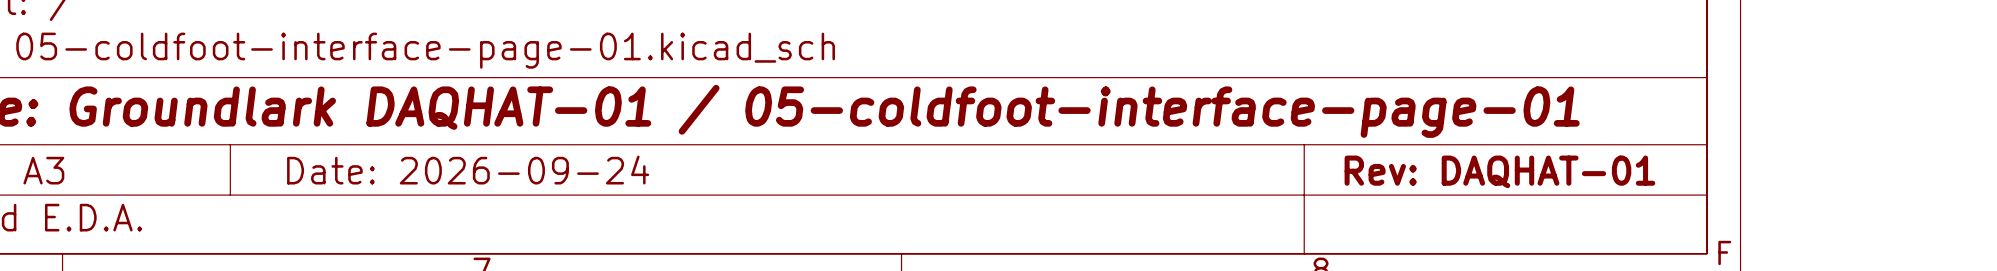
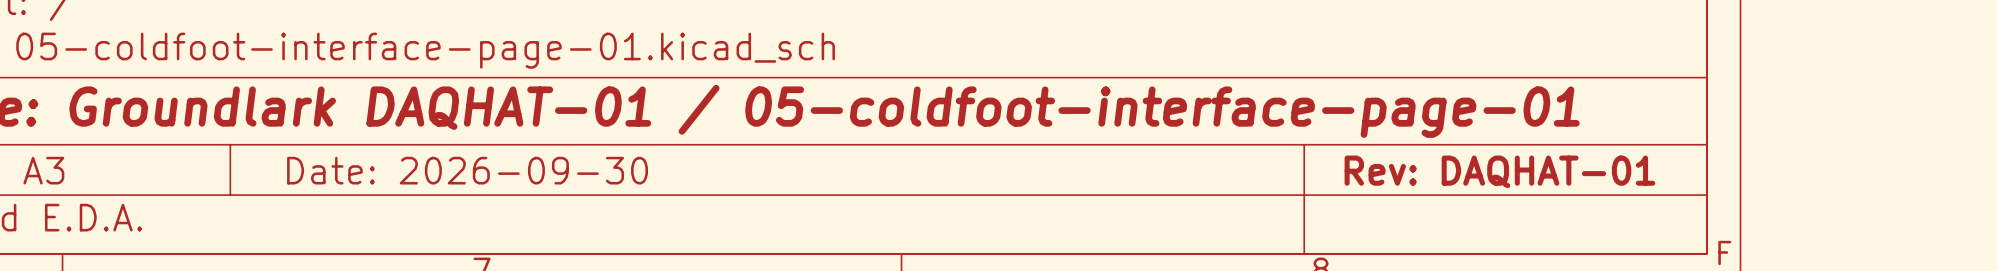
title block: Date: 2026-09-24 (468, 170) -> Date: 2026-09-30 (467, 170)

